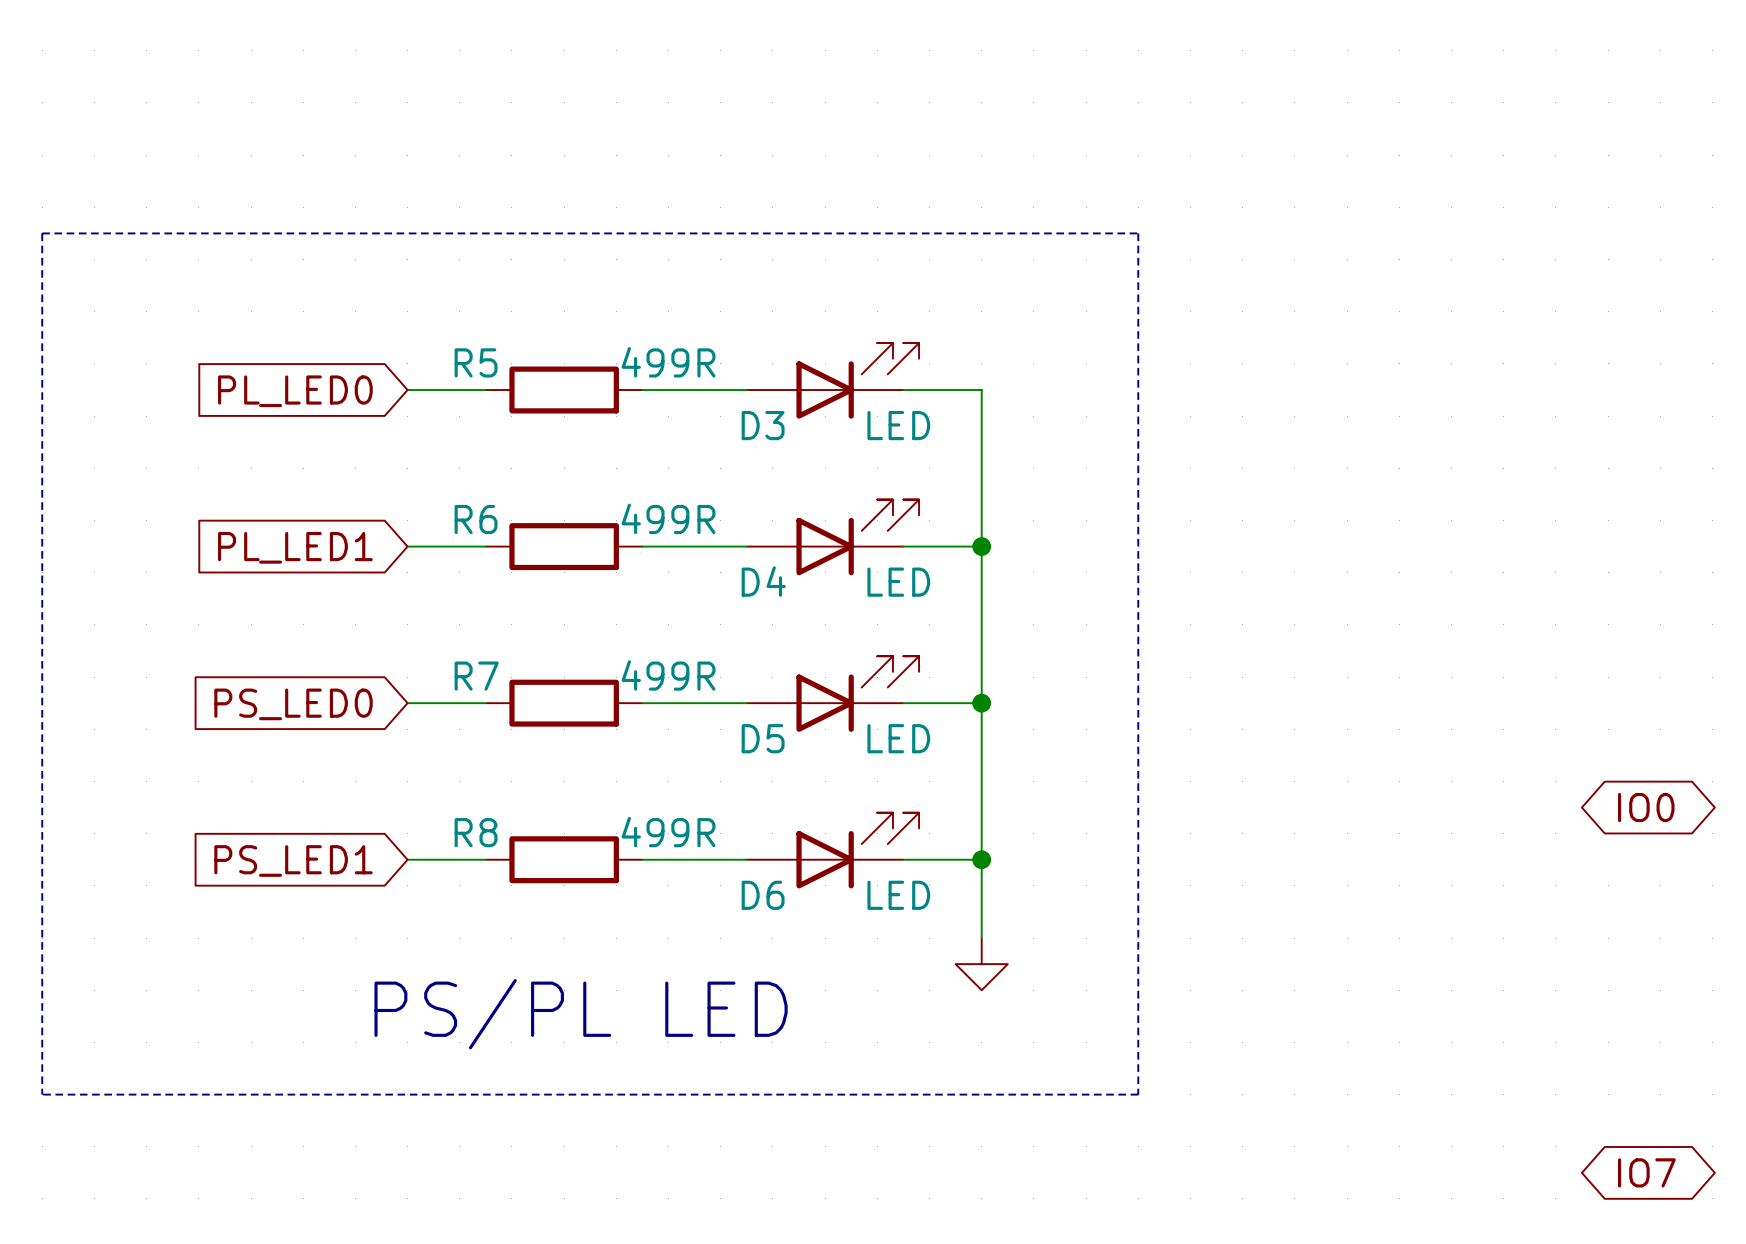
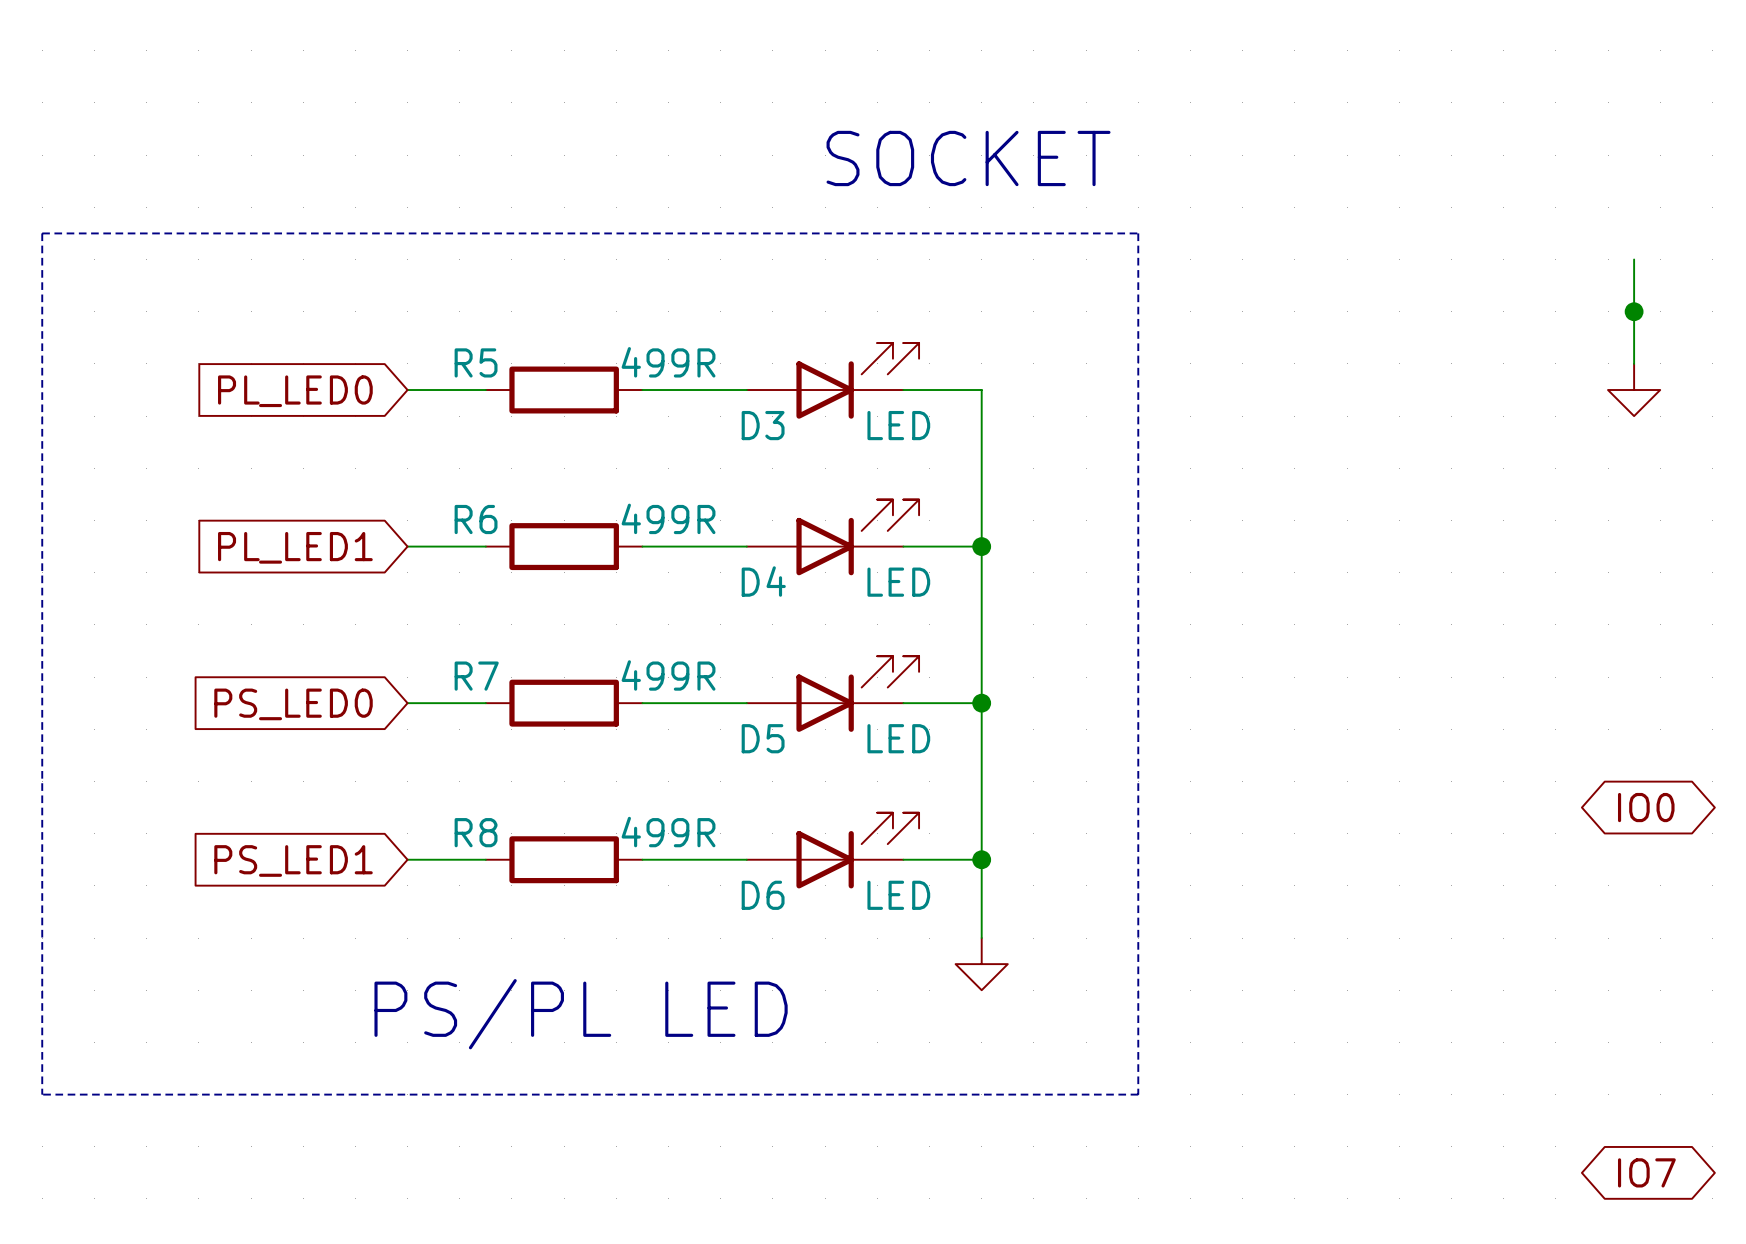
text: none -> SOCKET (968, 158)
wire: none -> (1634, 259) (1634, 363)
junction: none -> (1634, 311)
power symbol: none -> (1634, 390)

